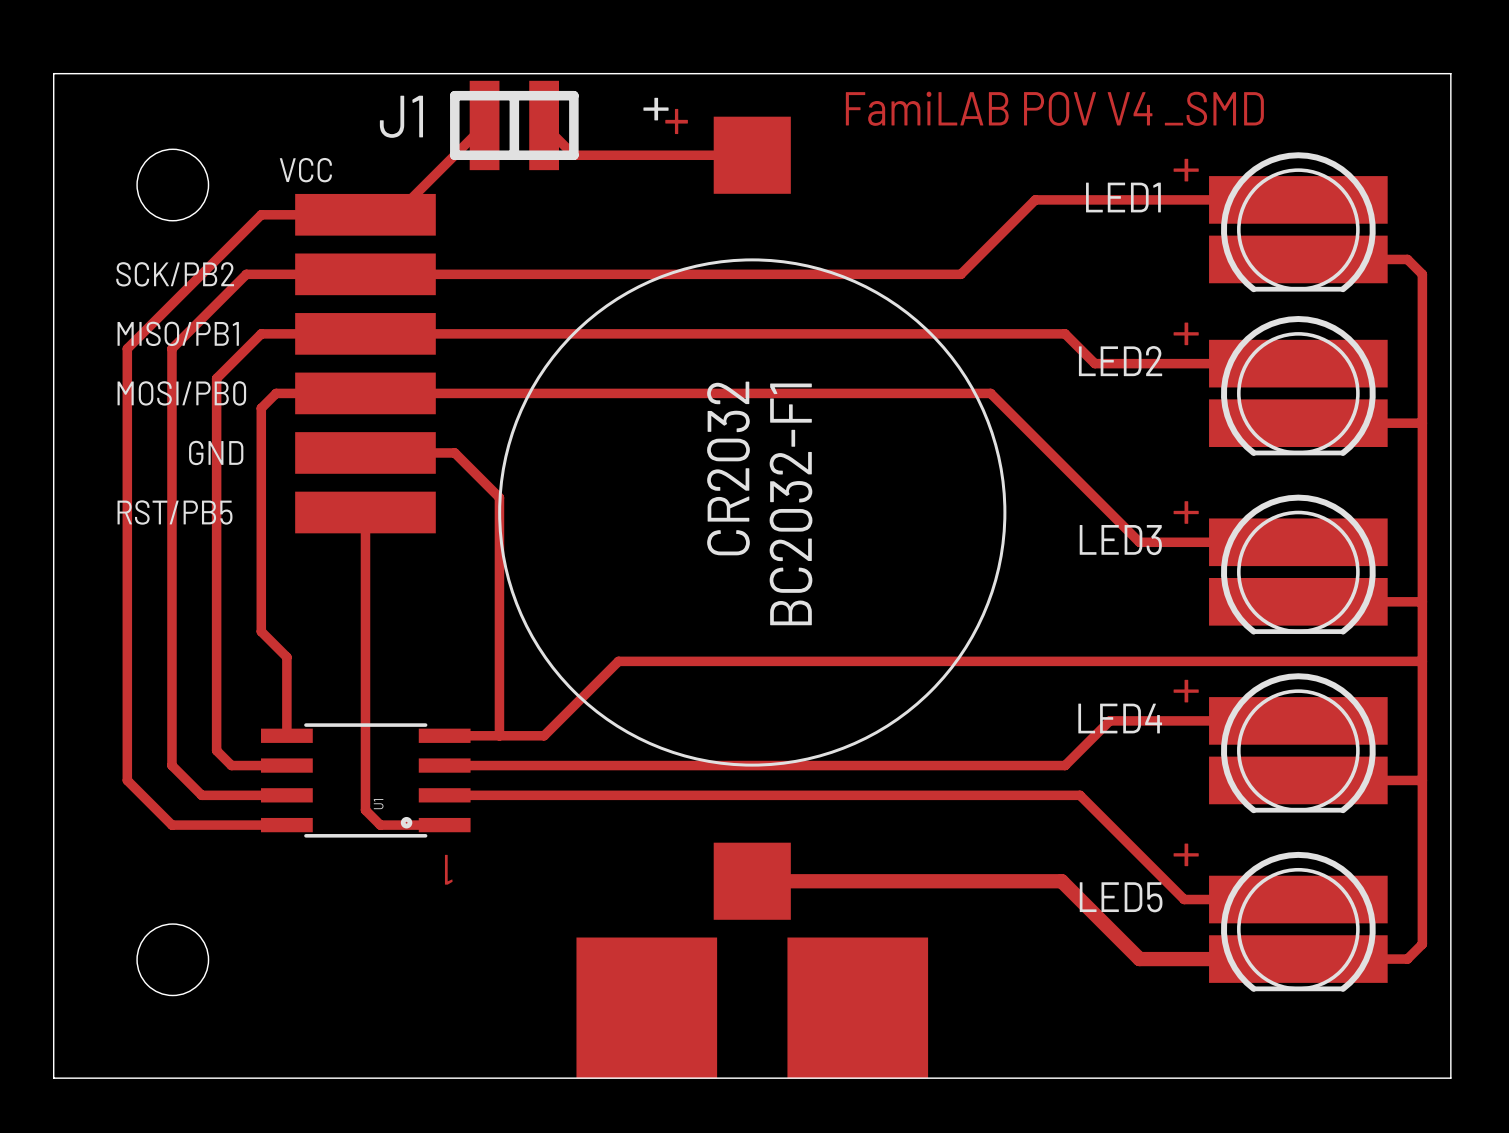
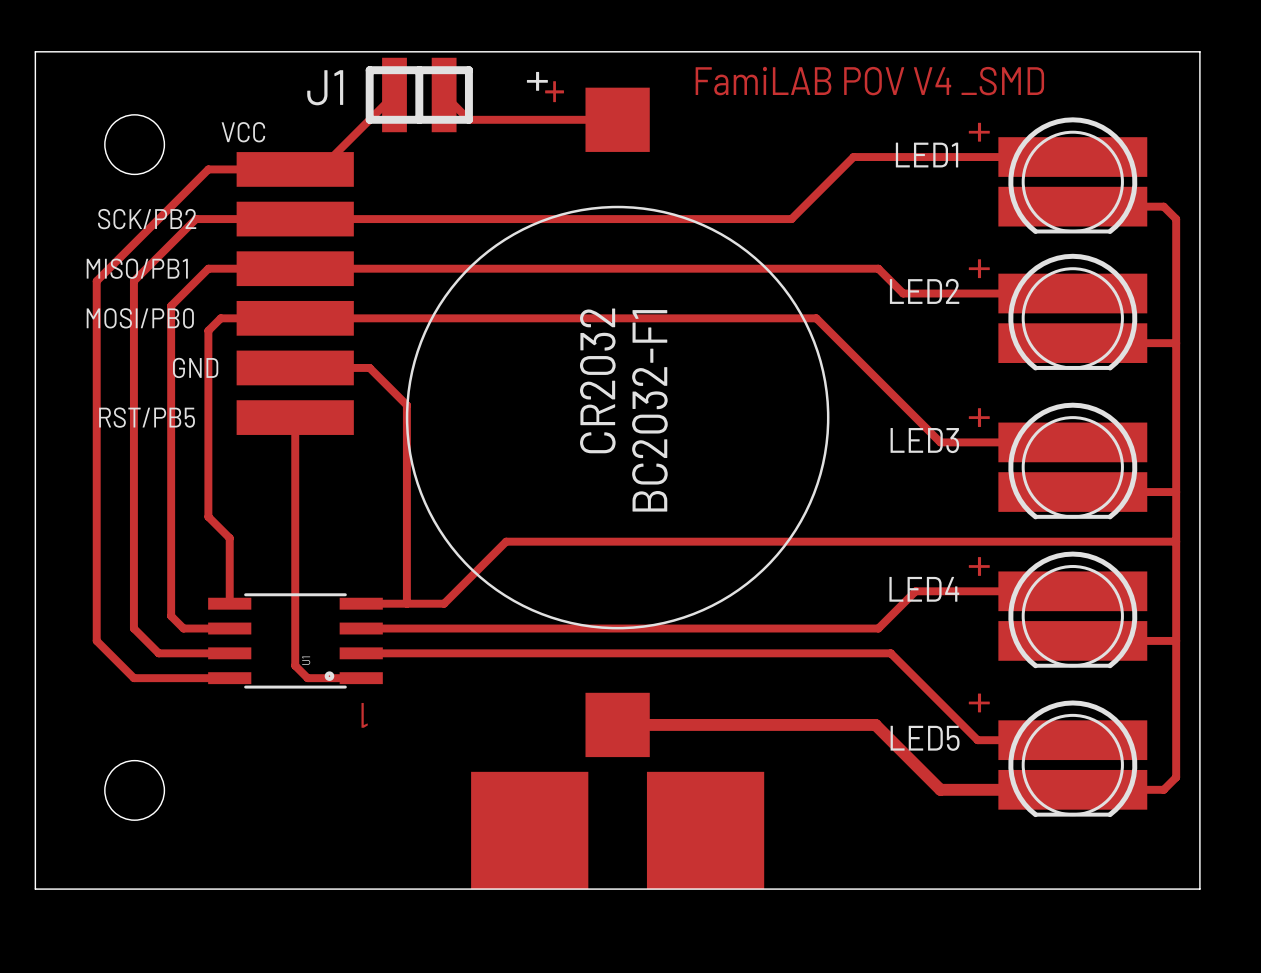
part text: none -> VCC (243, 132)
text: VCC (305, 170) -> none
text: SCK/PB2 (175, 274) -> none
part text: none -> SCK/PB2 (147, 219)
part text: none -> MISO/PB1 (137, 268)
text: MISO/PB1 (178, 333) -> none
part text: none -> MOSI/PB0 (140, 318)
text: MOSI/PB0 (181, 393) -> none
text: GND (216, 452) -> none
part text: none -> GND (195, 367)
text: RST/PB5 (175, 512) -> none
part text: none -> RST/PB5 (147, 417)

